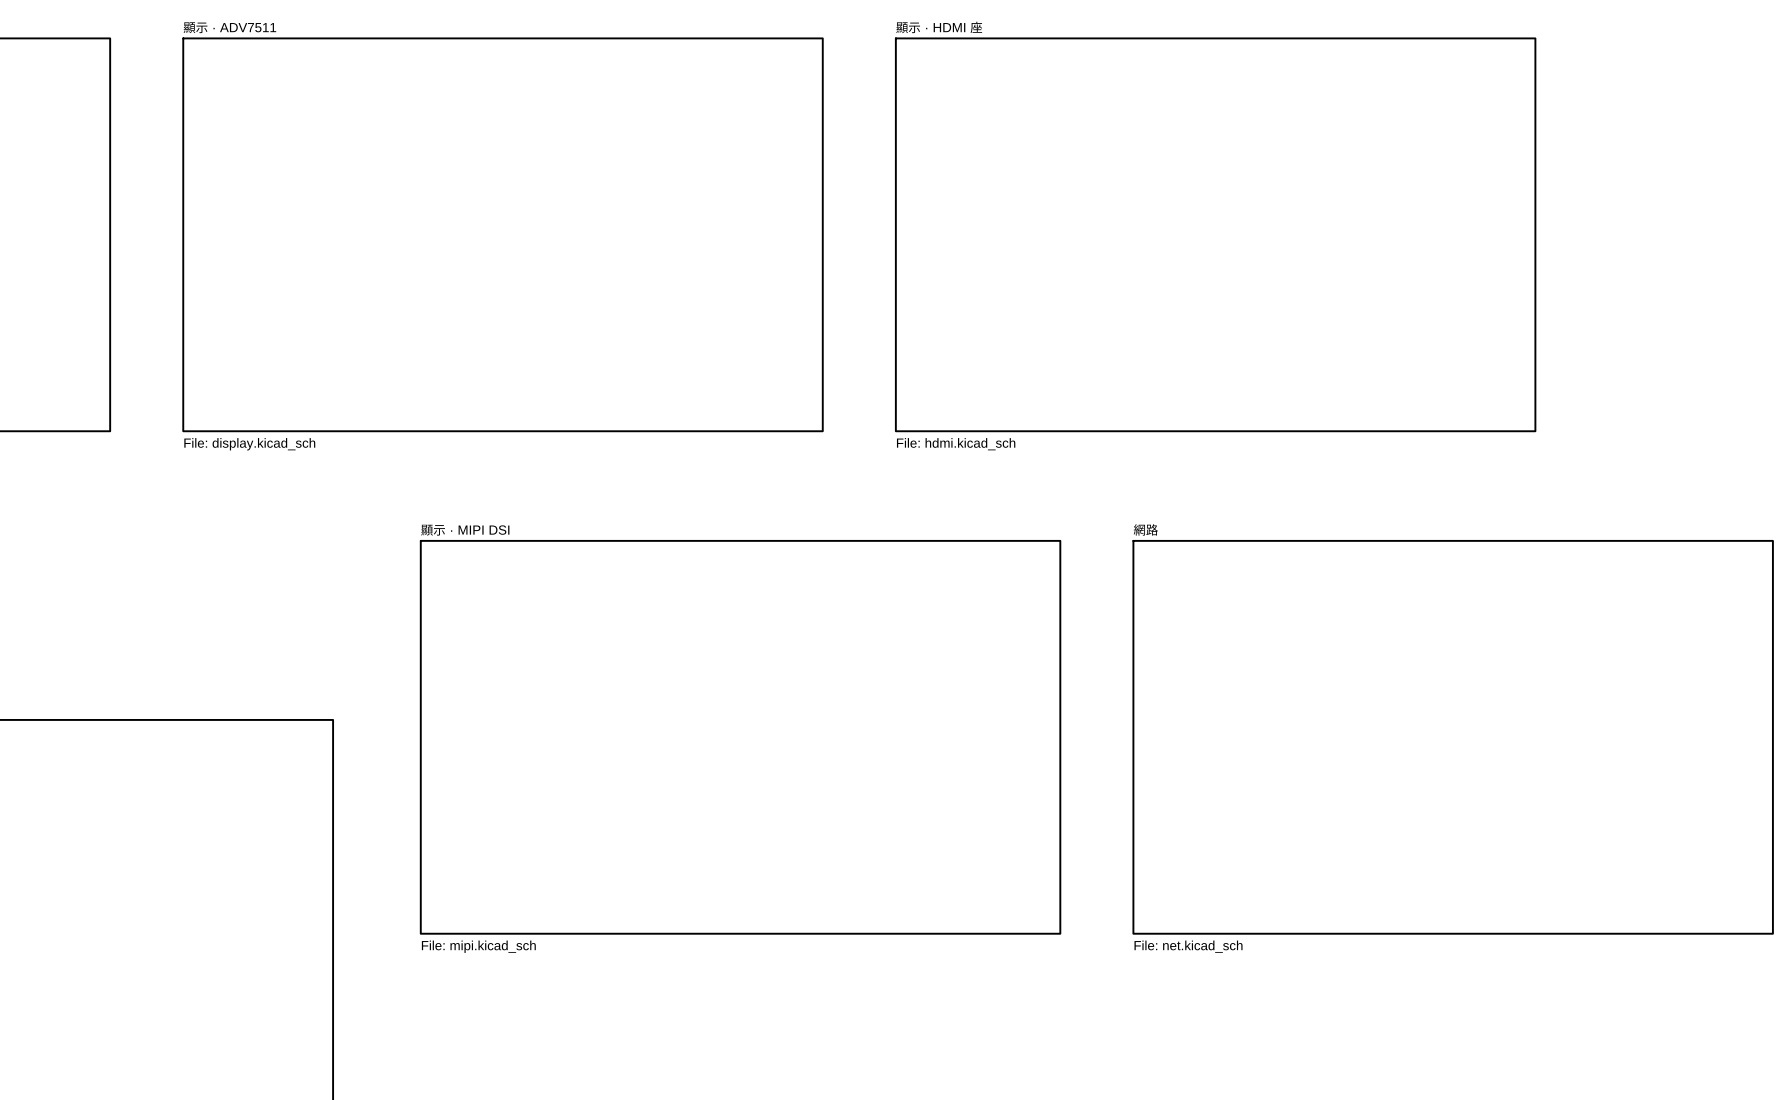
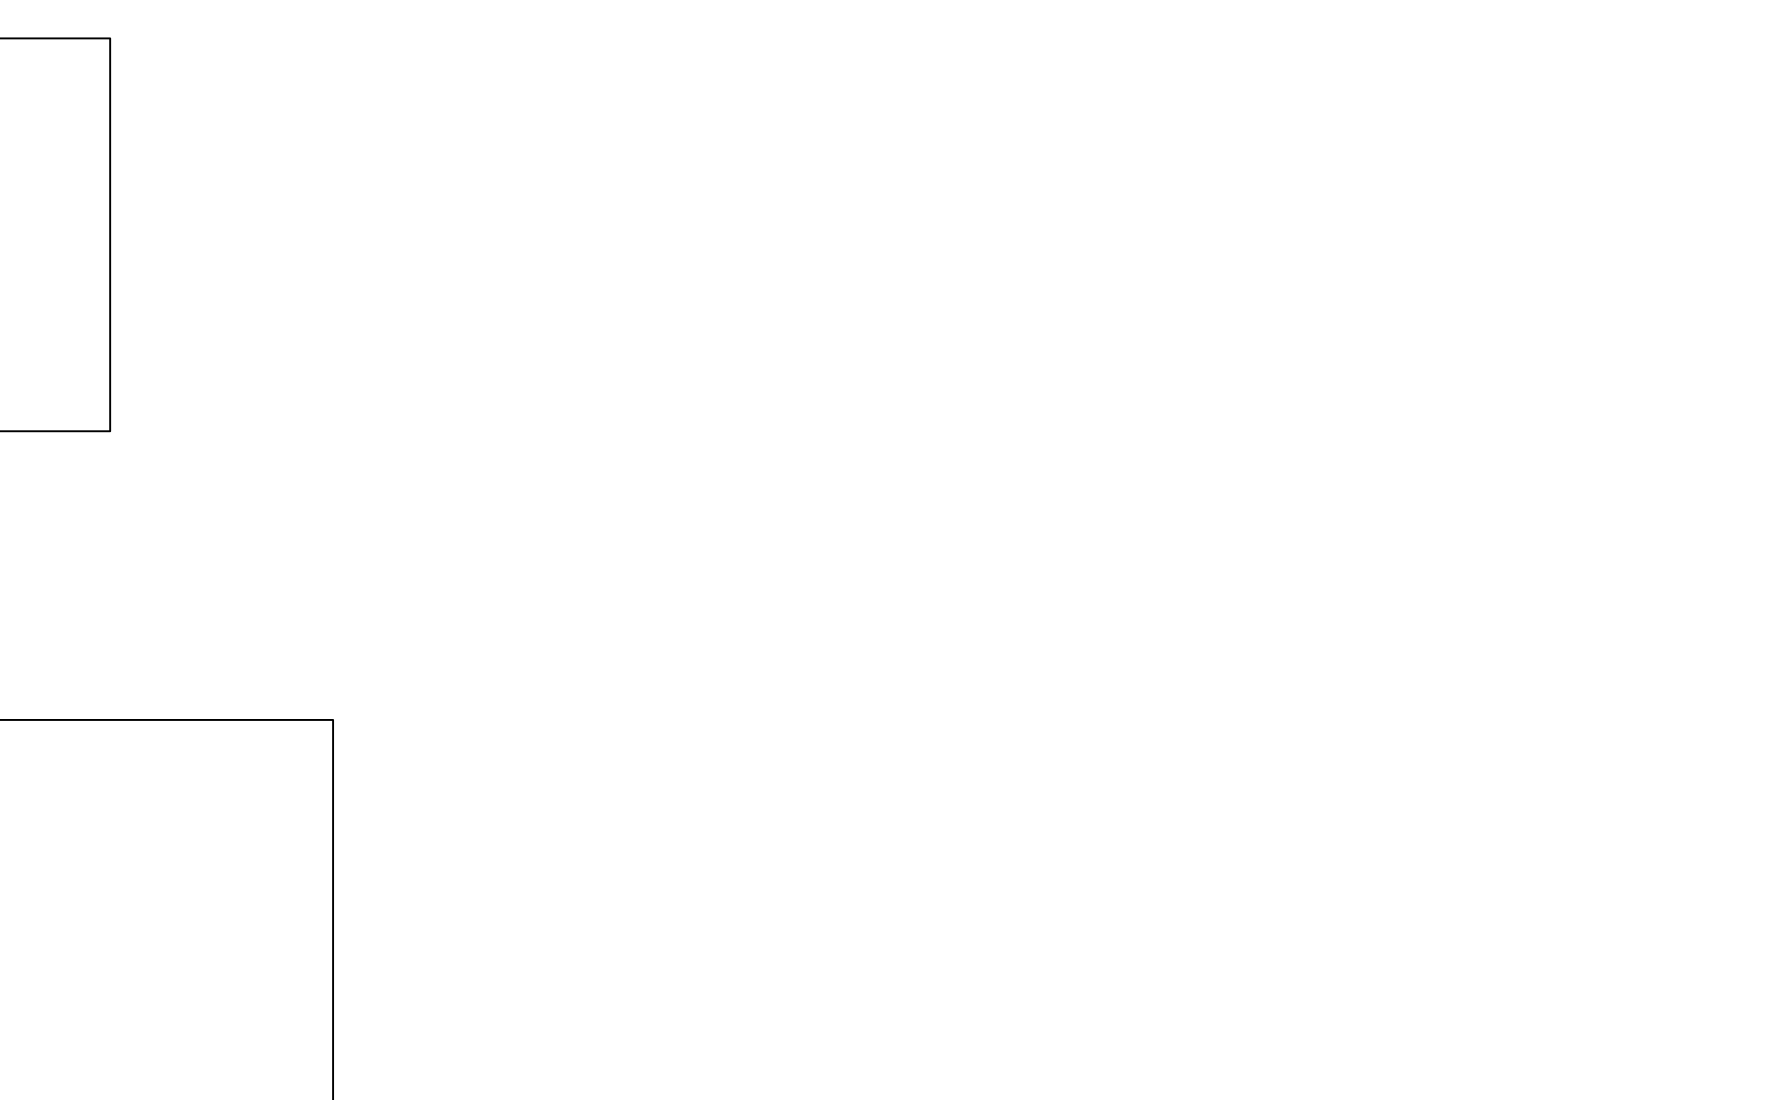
sheet 顯示 · ADV7511: File: display.kicad_sch (503, 234) -> none
sheet 顯示 · HDMI 座: File: hdmi.kicad_sch (1215, 234) -> none
sheet 顯示 · MIPI DSI: File: mipi.kicad_sch (740, 737) -> none
sheet 網路: File: net.kicad_sch (1453, 737) -> none

